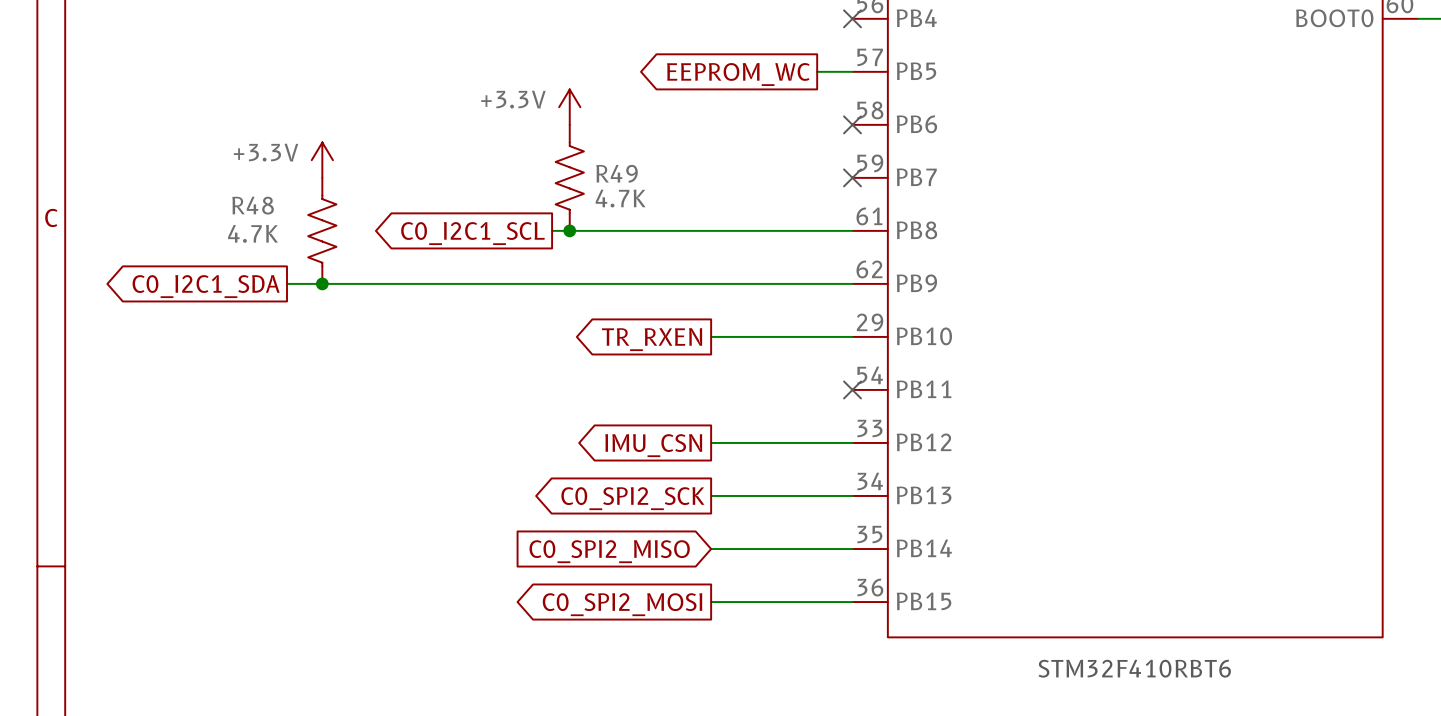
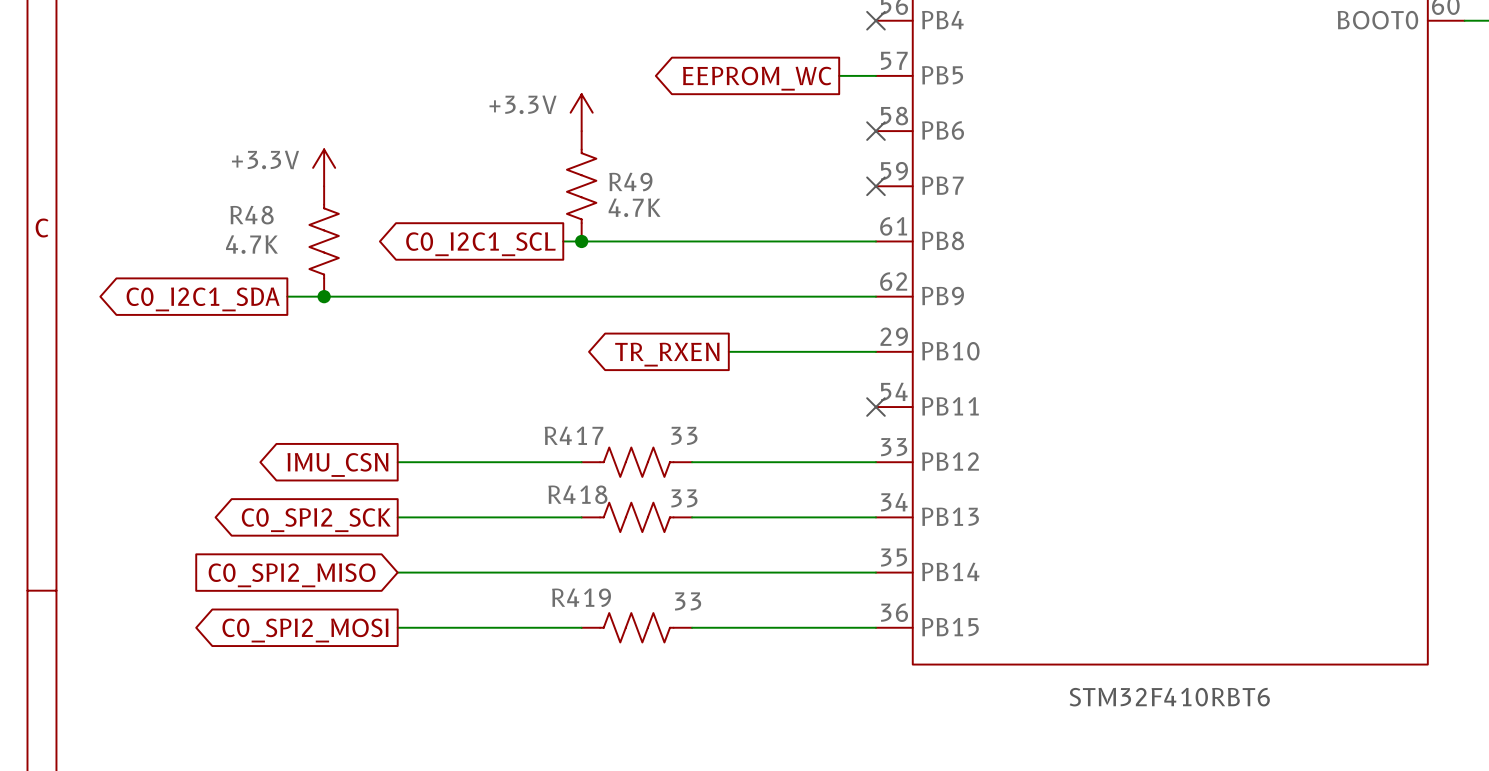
wire: none -> (397, 462) (581, 462)
R417: none -> 33 (636, 462)
wire: none -> (692, 462) (728, 462)
global label position: IMU_CSN (653, 445) -> IMU_CSN (337, 464)
wire: none -> (397, 517) (581, 517)
R418: none -> 33 (636, 517)
wire: none -> (692, 517) (728, 517)
global label position: C0_SPI2_SCK (632, 498) -> C0_SPI2_SCK (316, 520)
wire: none -> (397, 572) (728, 572)
global label position: C0_SPI2_MISO (609, 551) -> C0_SPI2_MISO (292, 575)
wire: none -> (397, 627) (581, 627)
R419: none -> 33 (636, 627)
wire: none -> (692, 627) (728, 627)
global label position: C0_SPI2_MOSI (622, 604) -> C0_SPI2_MOSI (305, 630)

